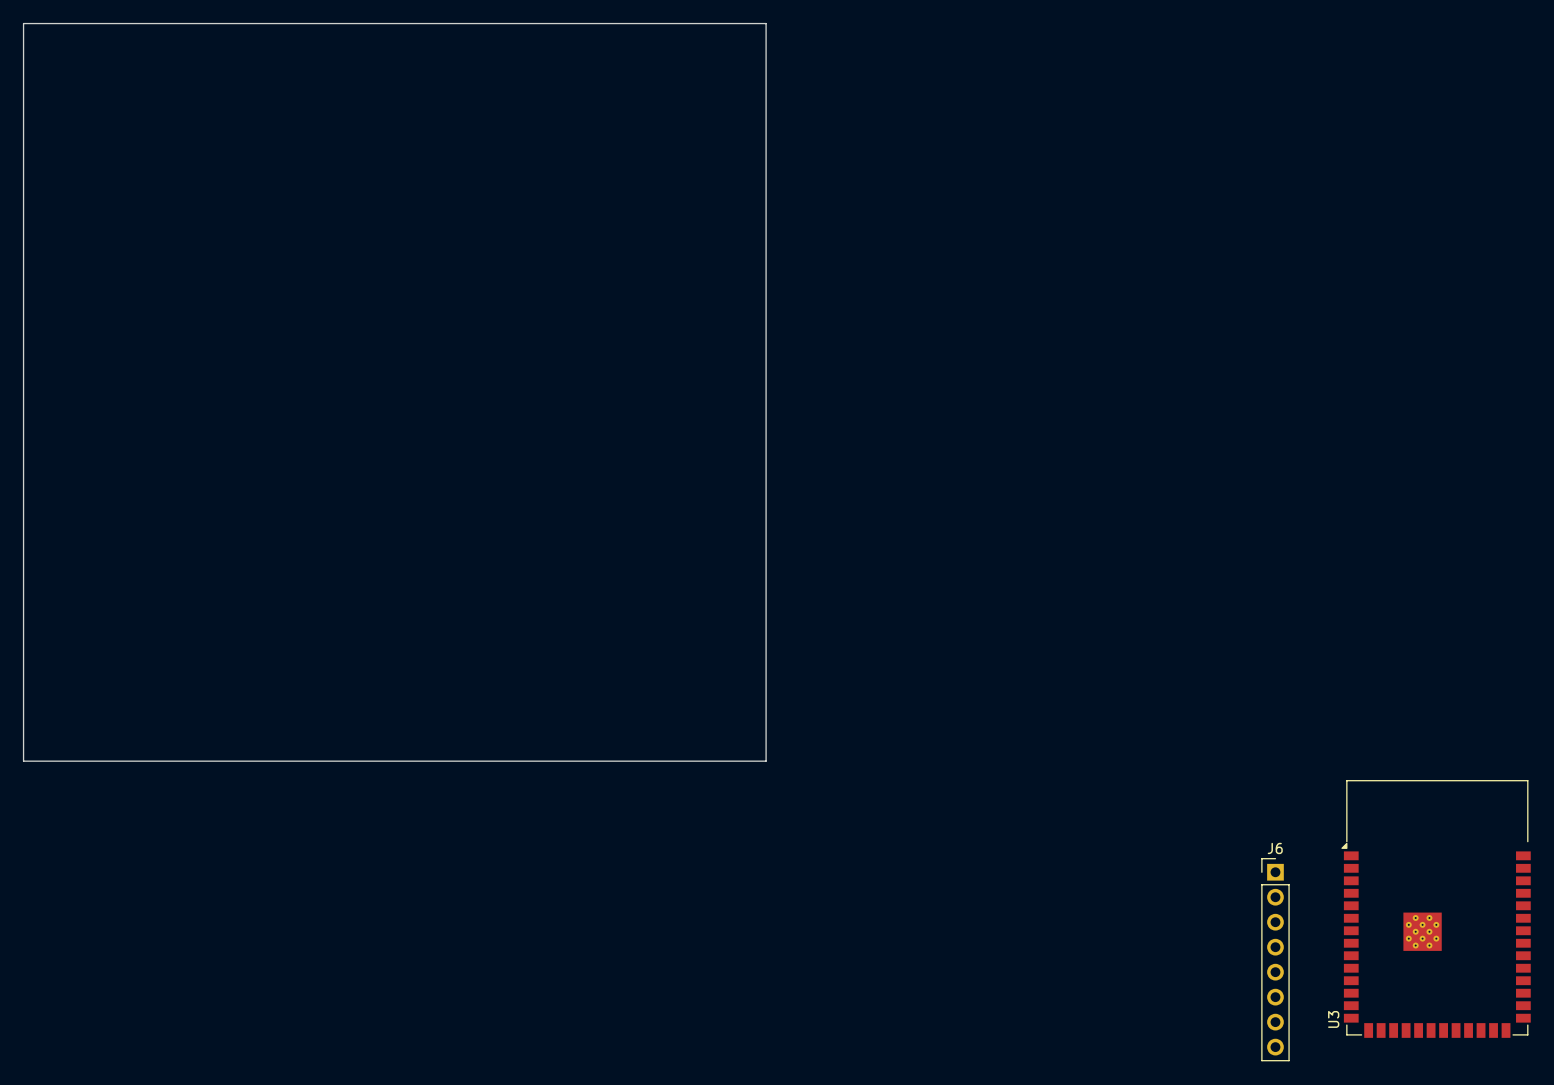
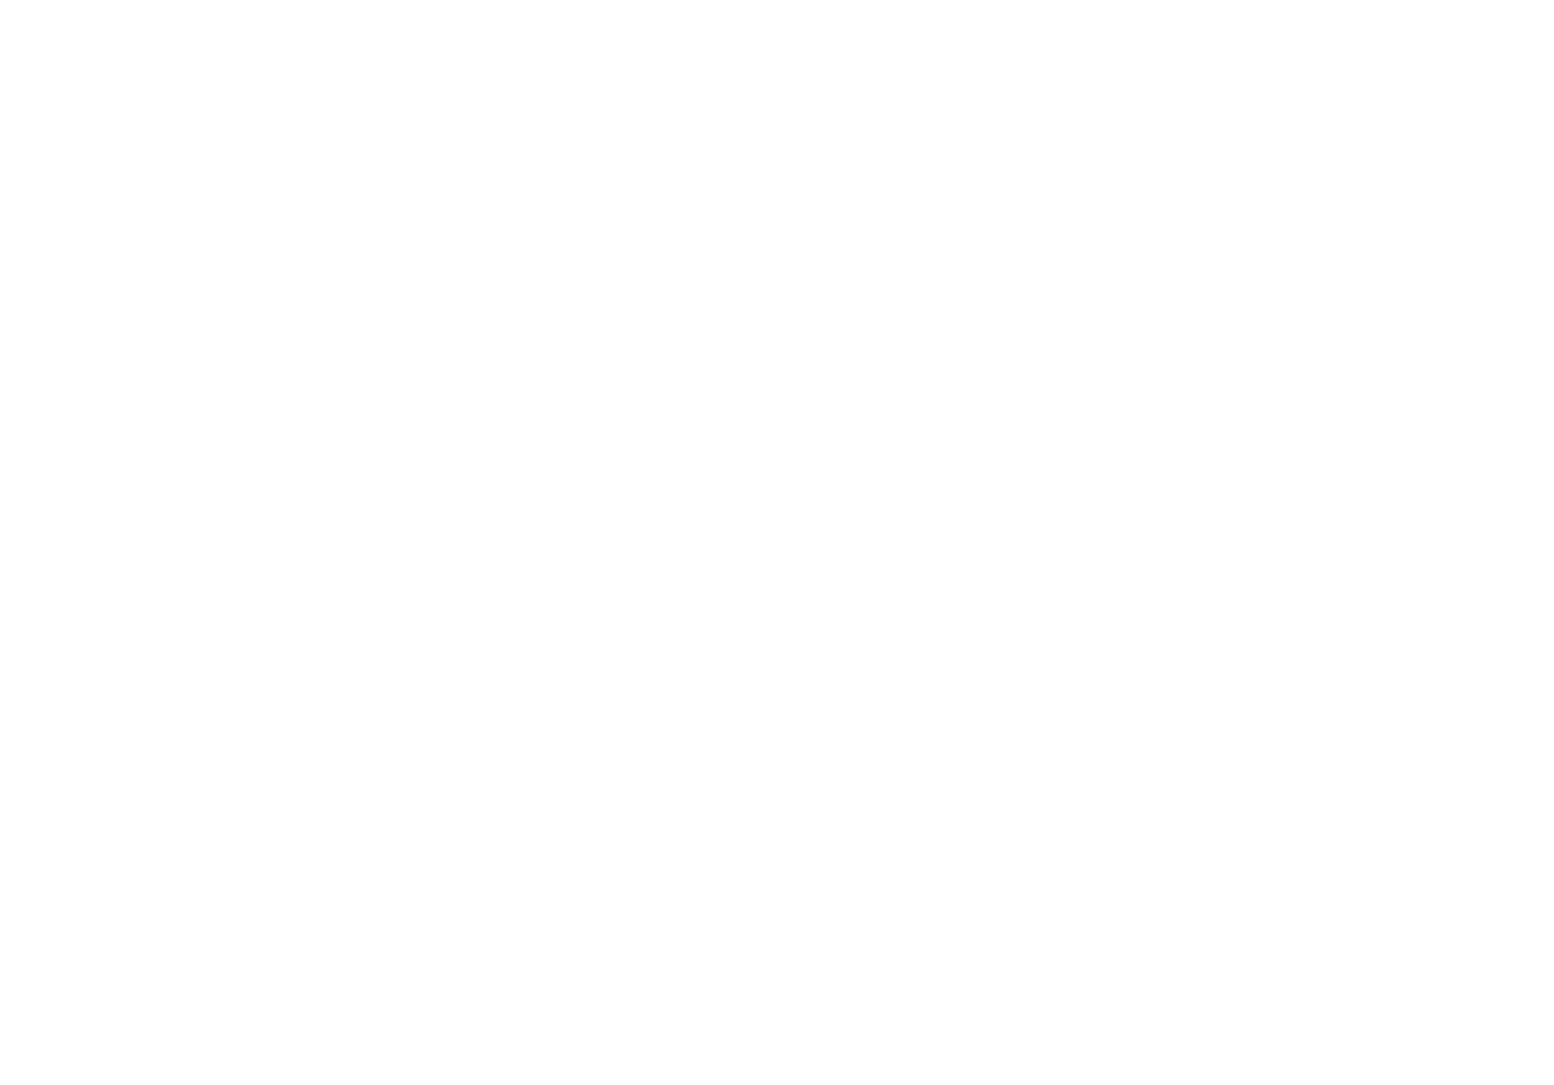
board edge: (23, 23) (766, 23) (766, 761) (23, 761) (23, 23) -> none
U3: (1436, 908) -> none
J6: (1275, 959) -> none

